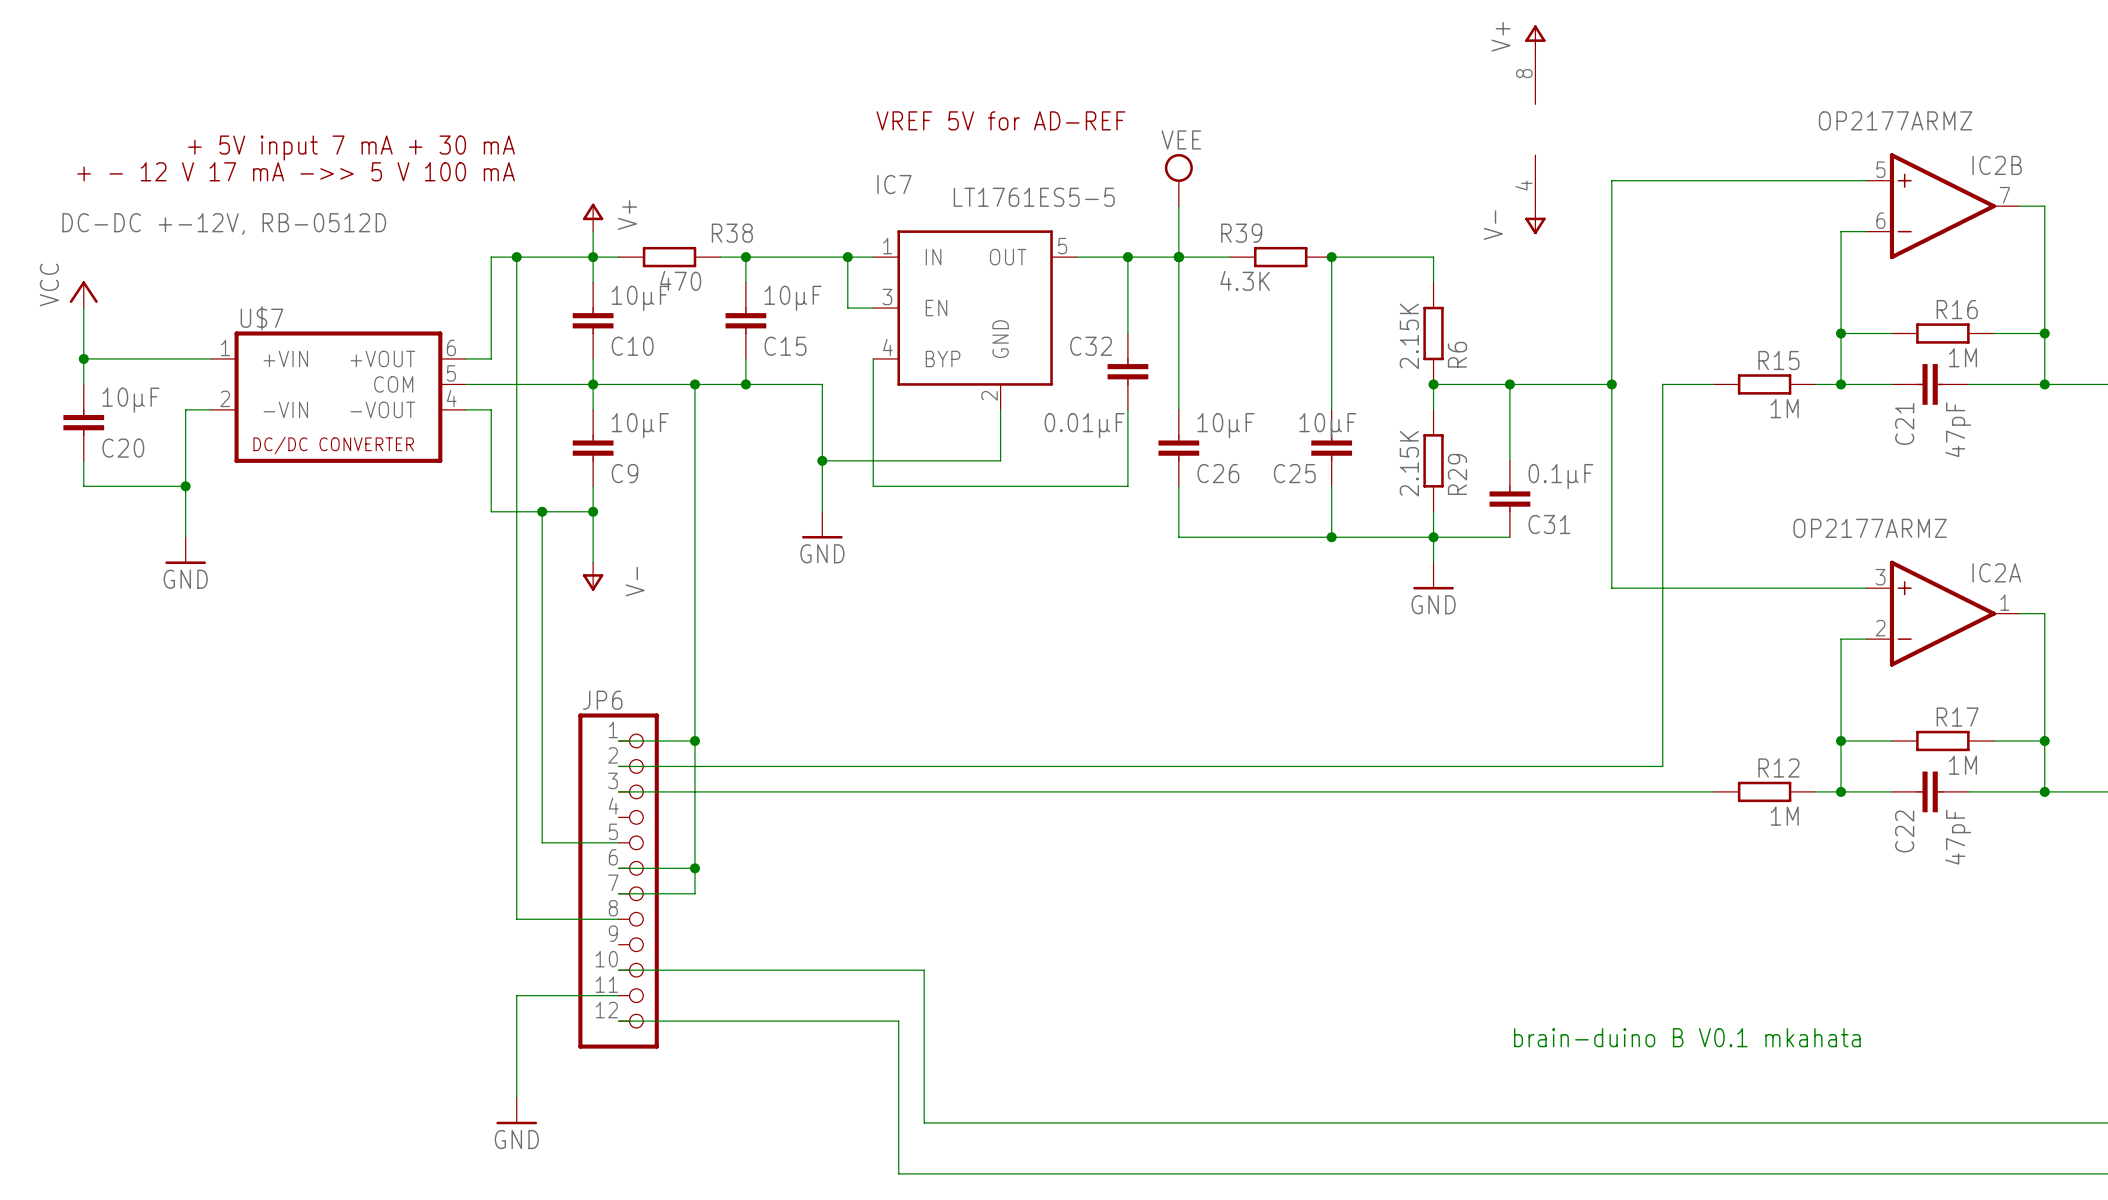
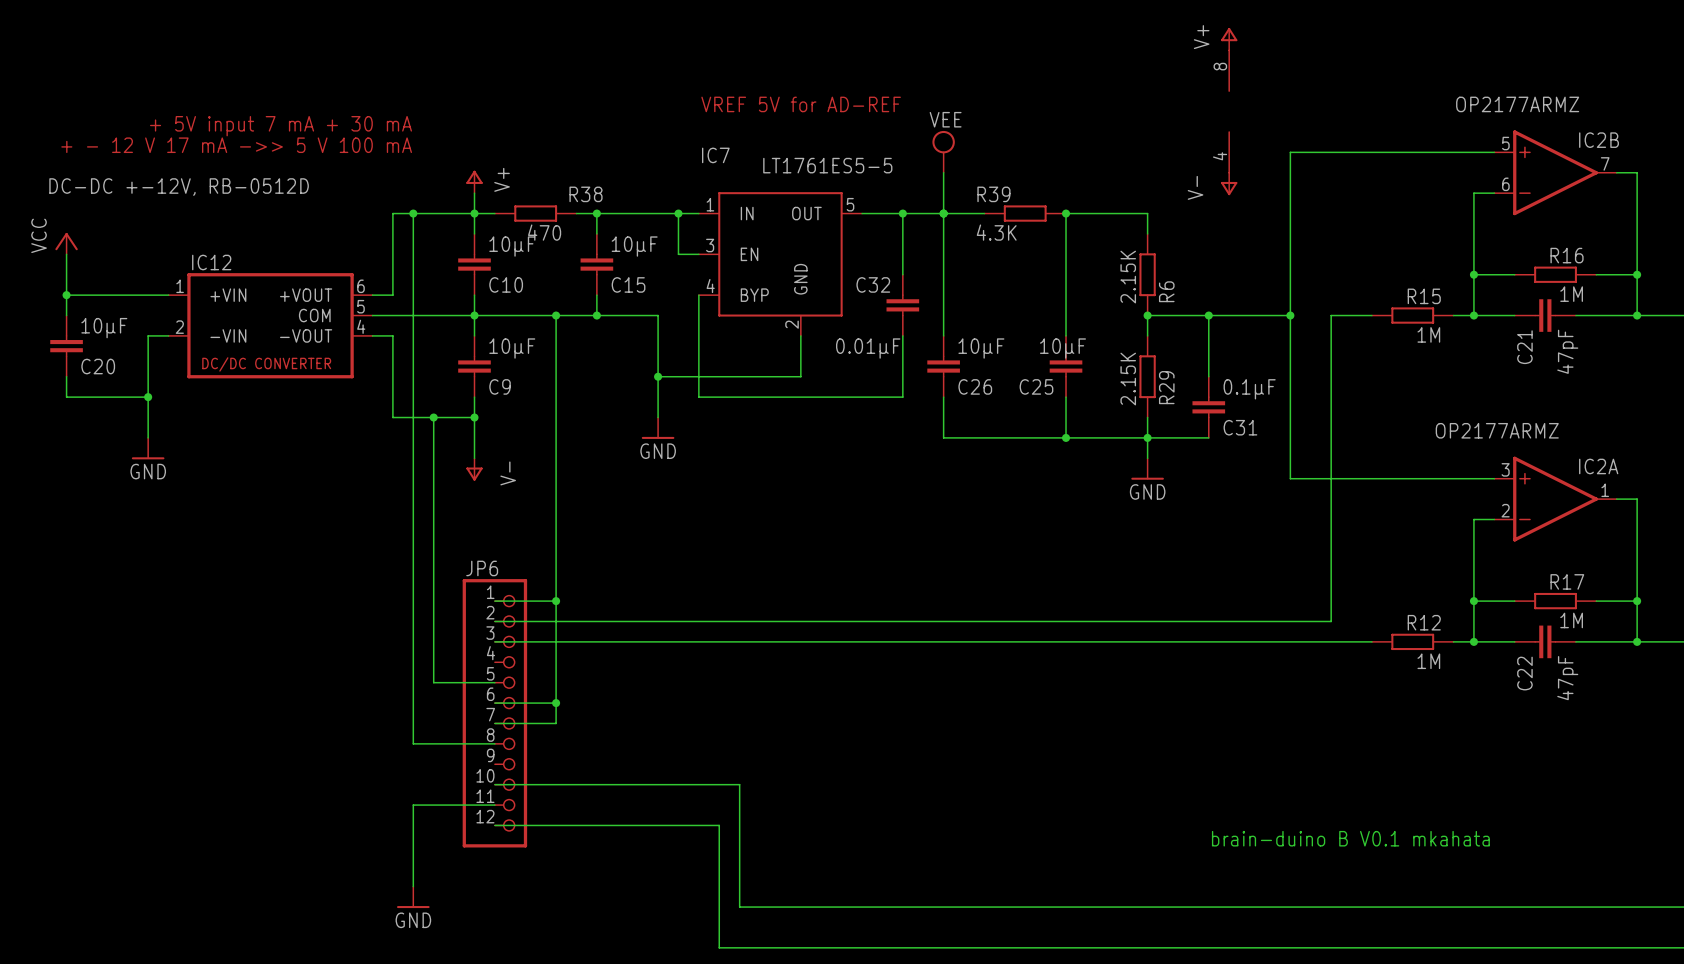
U$7 name: U$7 (261, 318) -> IC12 (211, 262)

